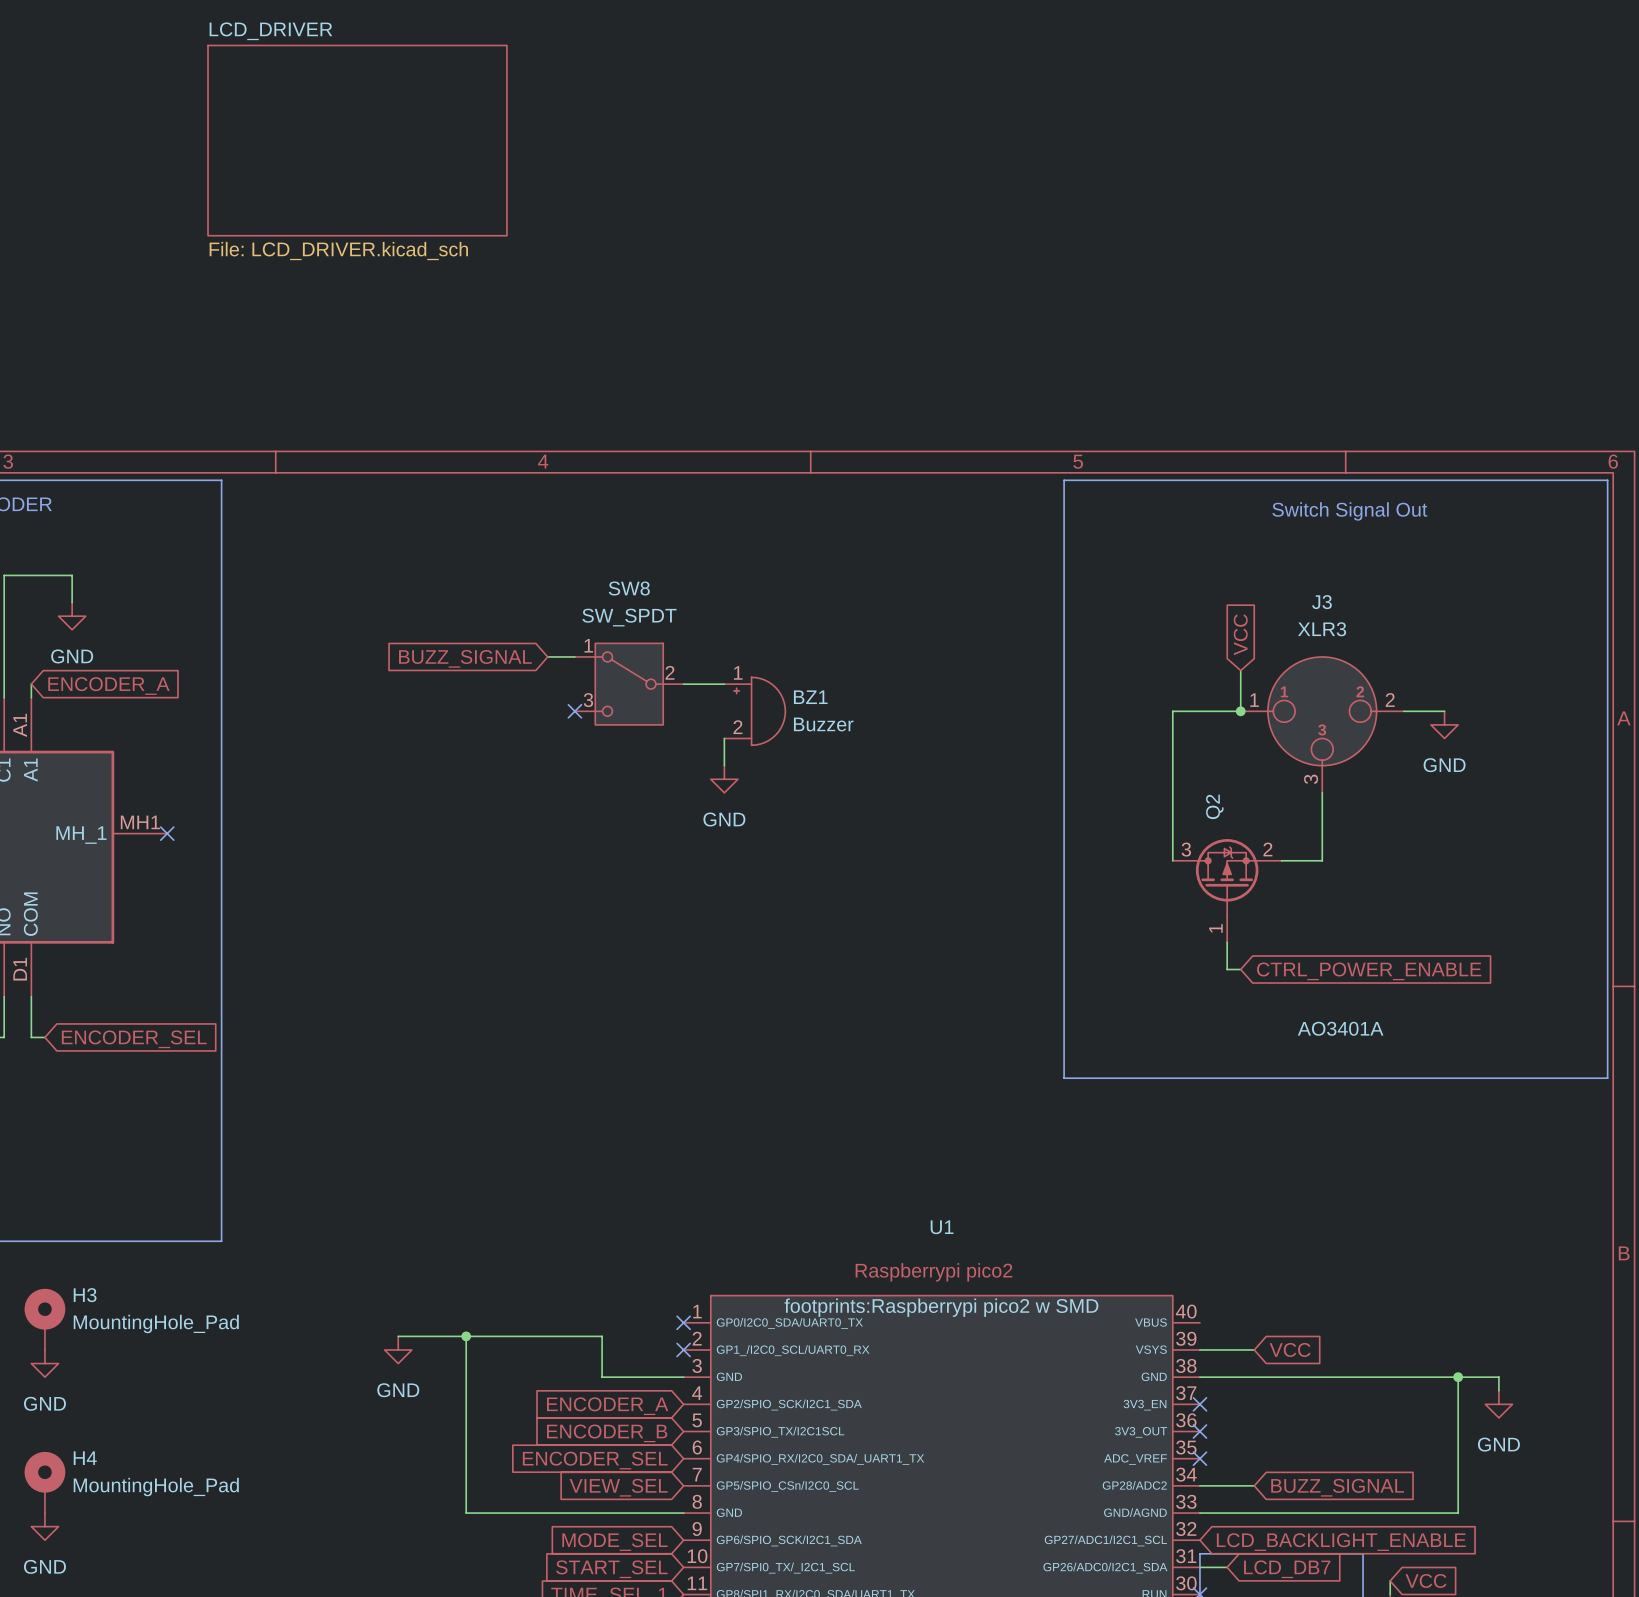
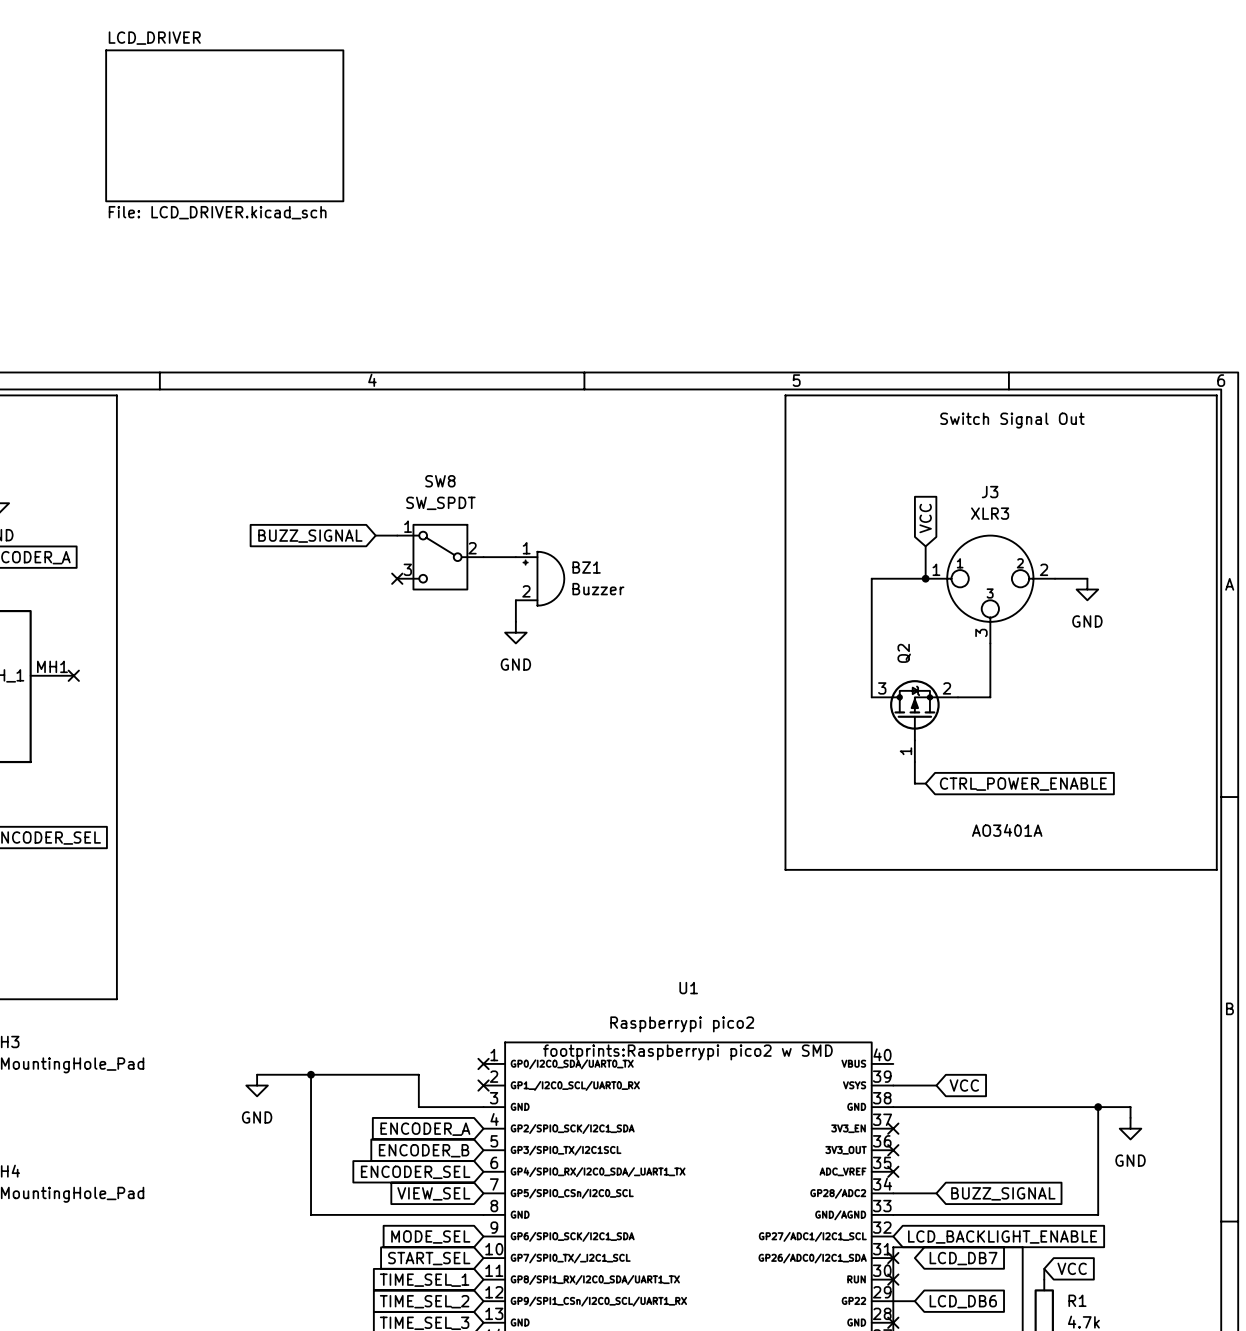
wire: (1199, 1567) (1227, 1567) -> none
no-connect mark: none -> (893, 1258)

